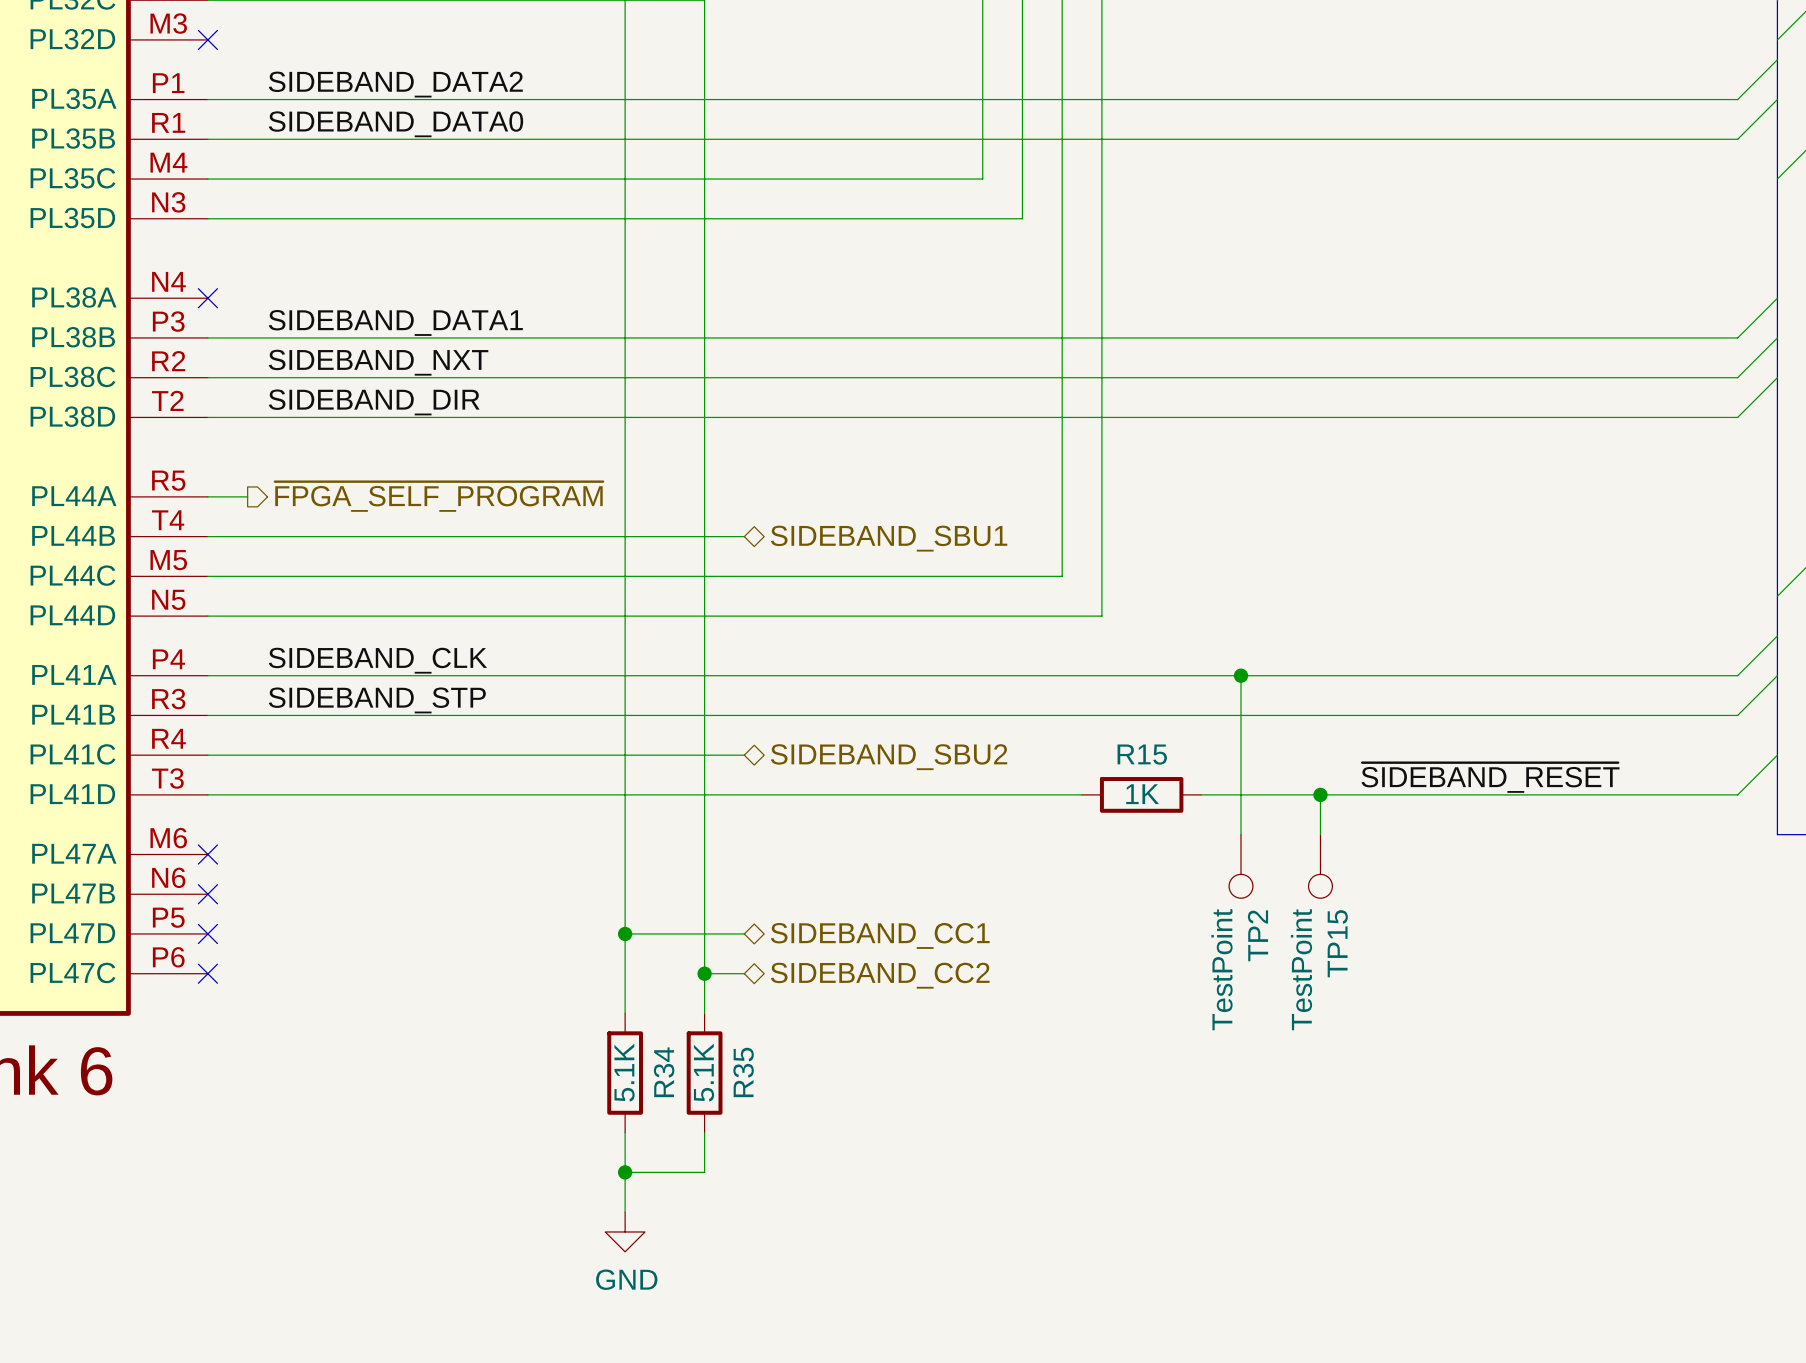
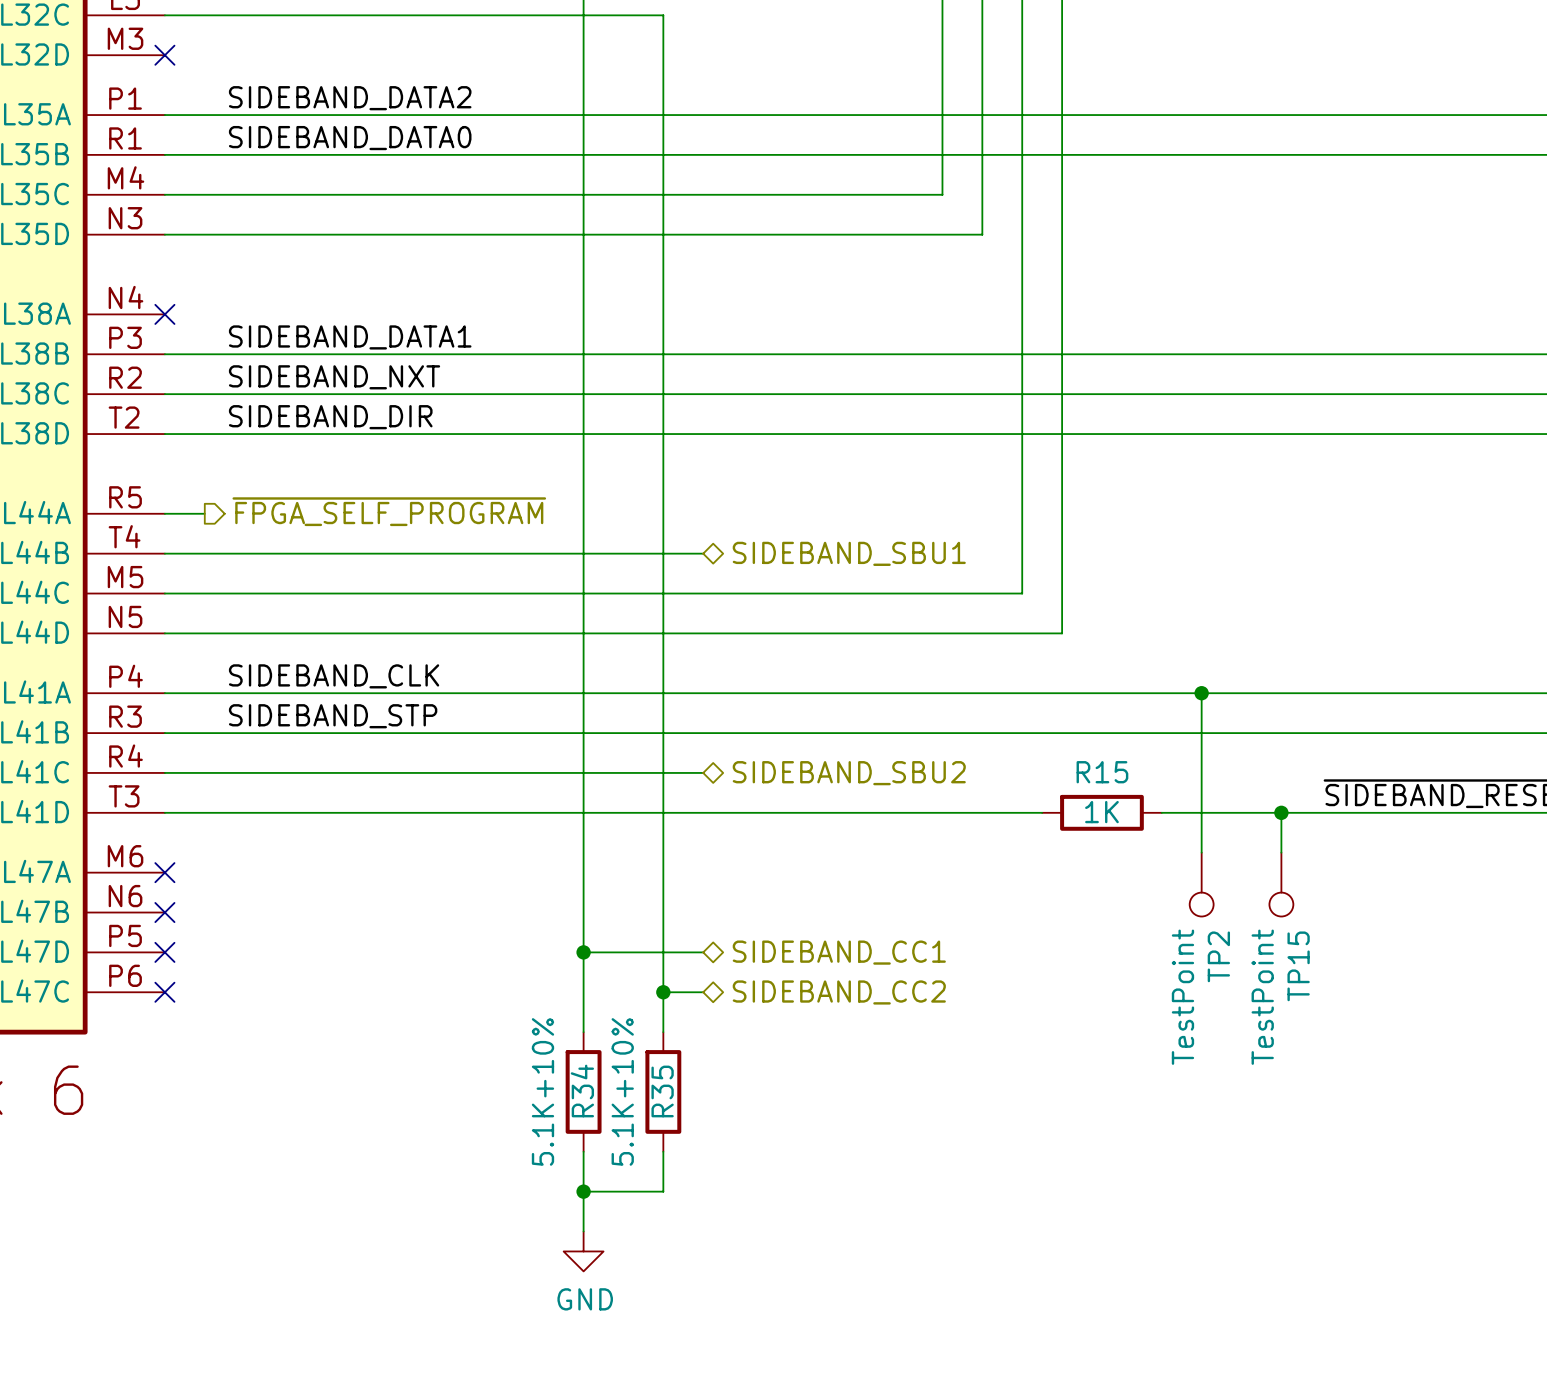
R34 value: 5.1K (624, 1072) -> 5.1K+10% (542, 1091)
R34 name position: R34 (664, 1072) -> R34 (582, 1091)
R35 value: 5.1K (703, 1072) -> 5.1K+10% (622, 1091)
R35 name position: R35 (743, 1072) -> R35 (662, 1091)

